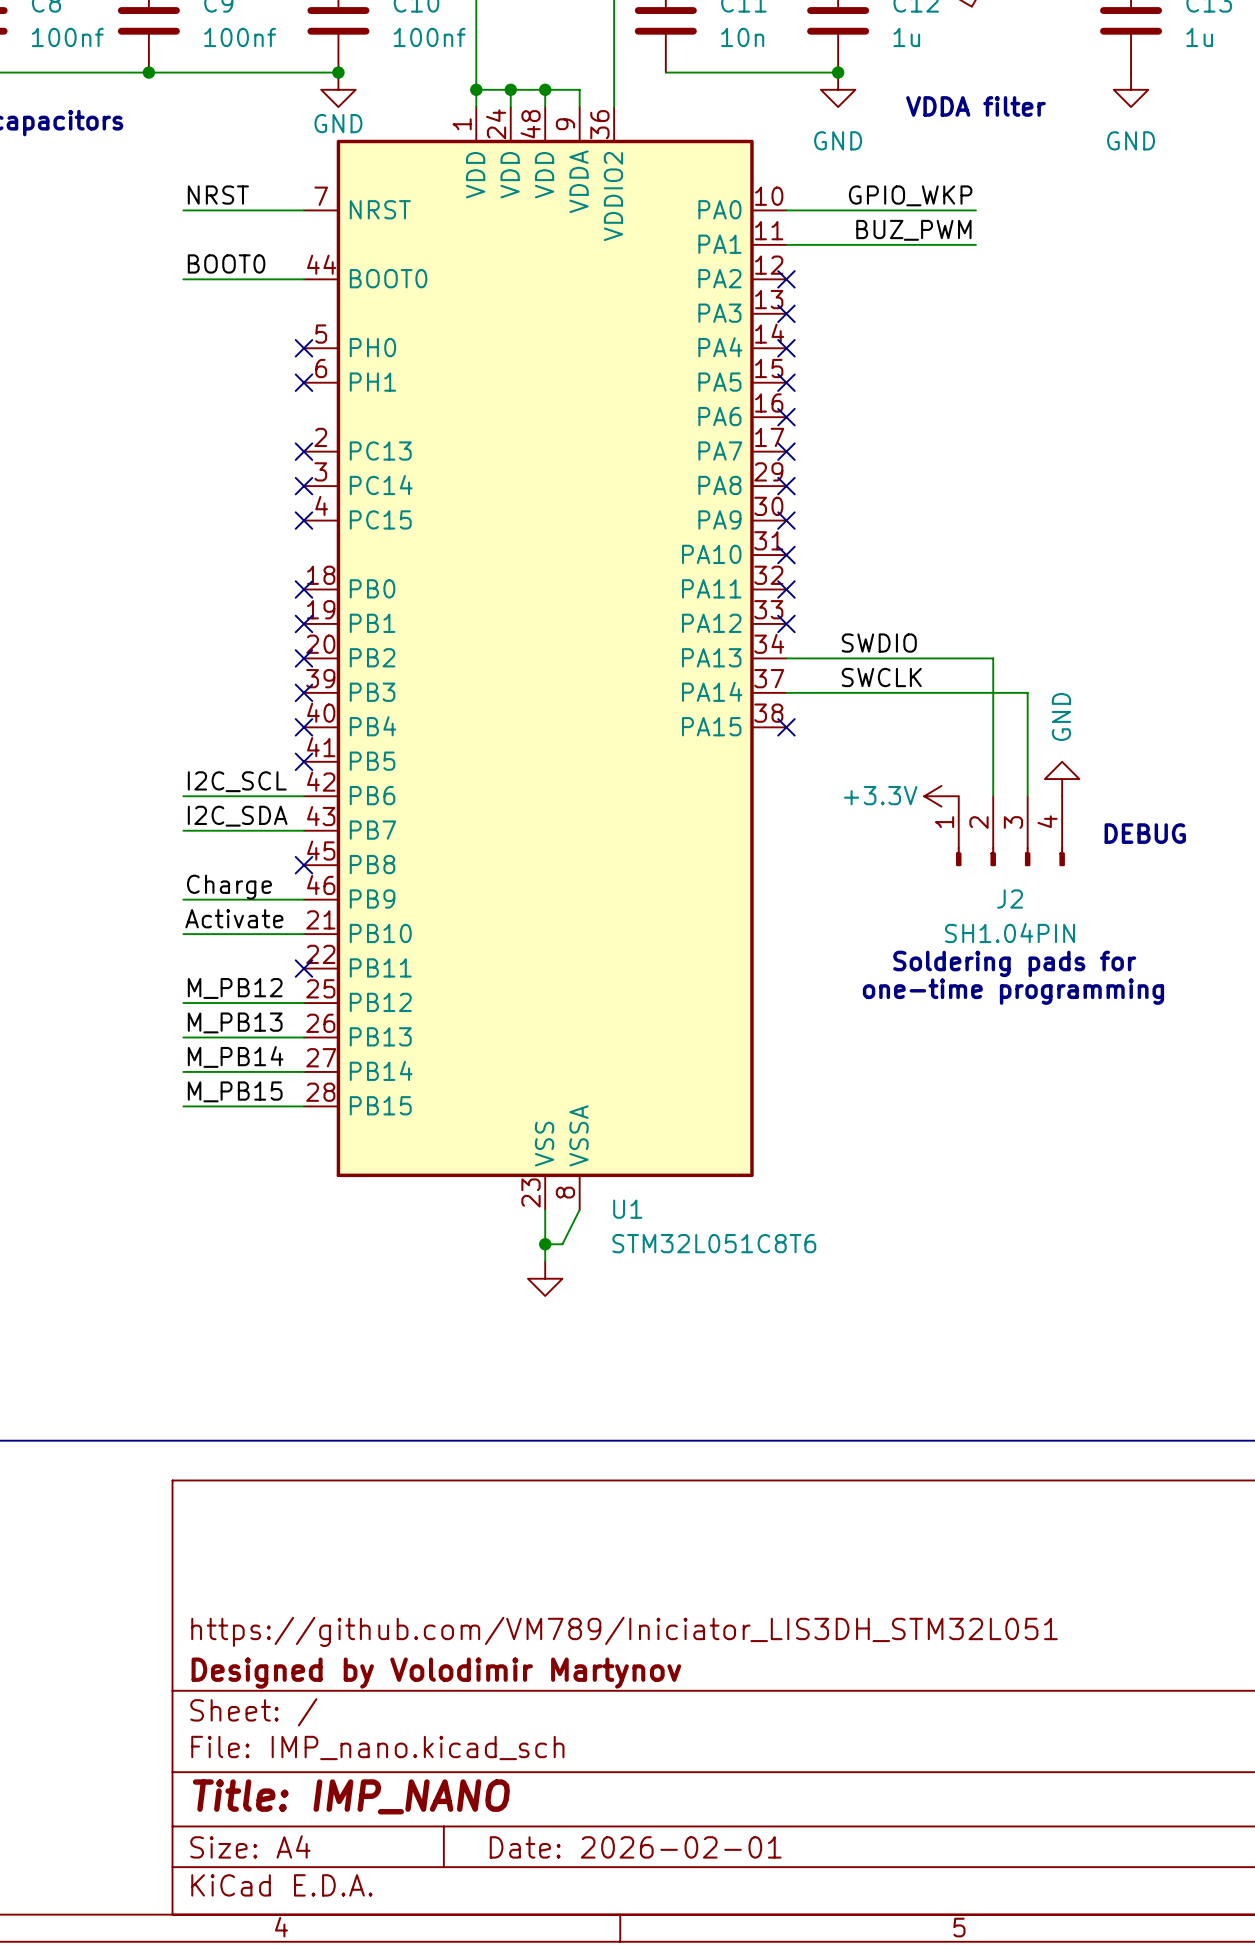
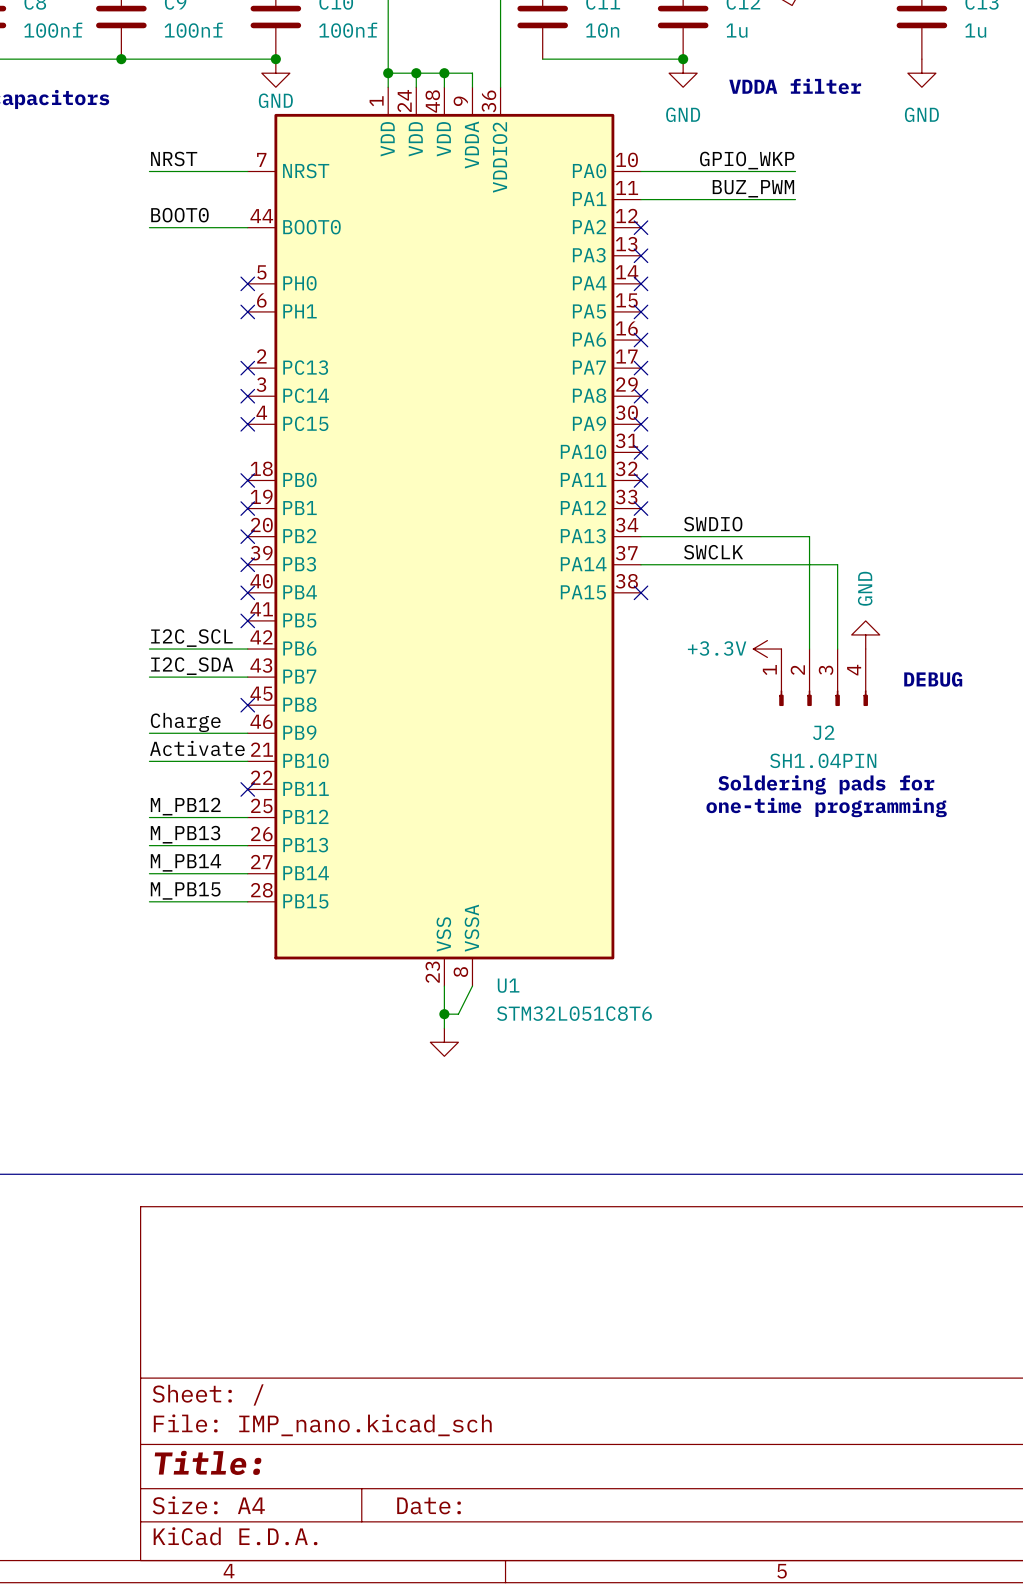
title block: https://github.com/VM789/Iniciator_LIS3DH_STM32L051 (624, 1631) -> none
title block: Designed by Volodimir Martynov (436, 1673) -> none
title block: Title: IMP_NANO (351, 1796) -> Title: (208, 1462)
title block: Date: 2026-02-01 (635, 1847) -> Date: (429, 1505)

